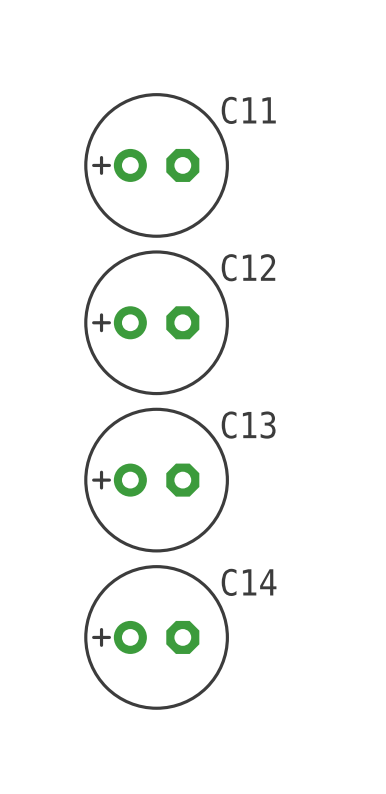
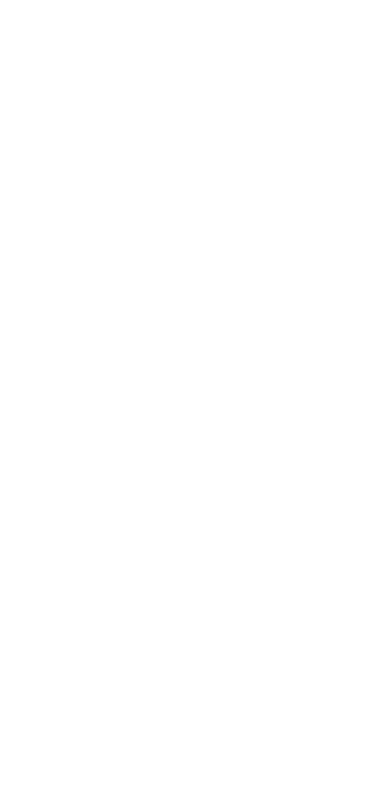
C11: (156, 165) -> none
C12: (156, 322) -> none
C13: (156, 480) -> none
C14: (156, 637) -> none

